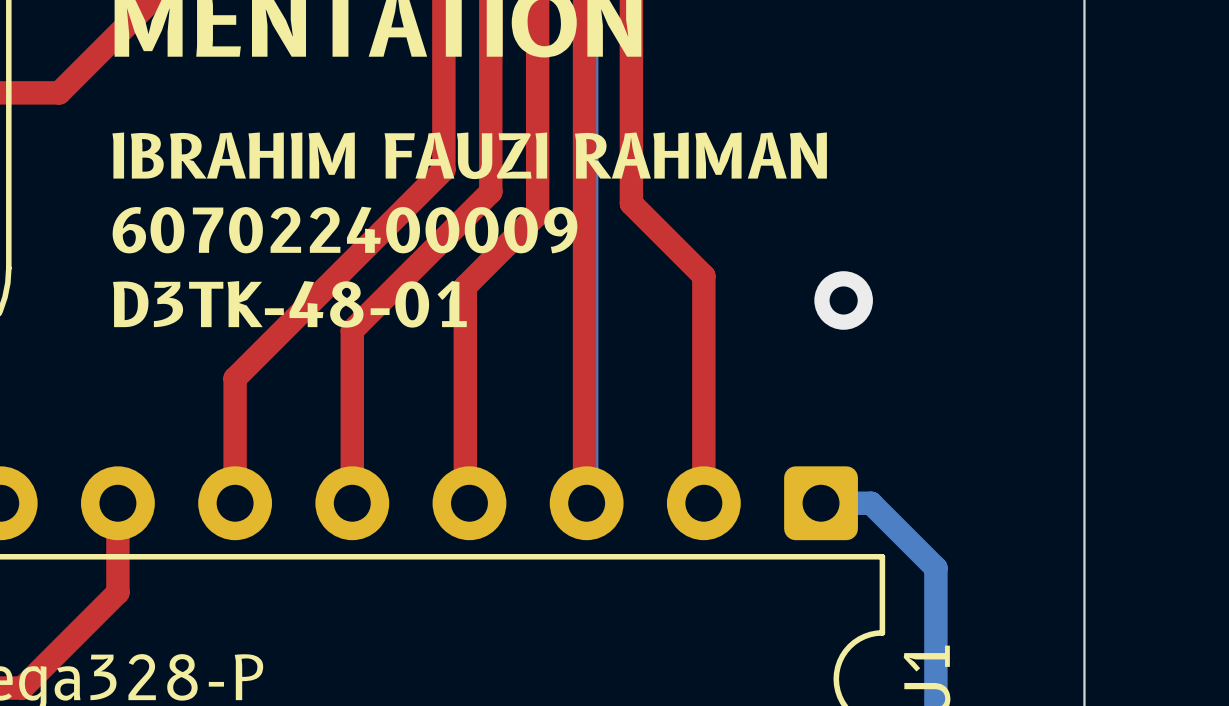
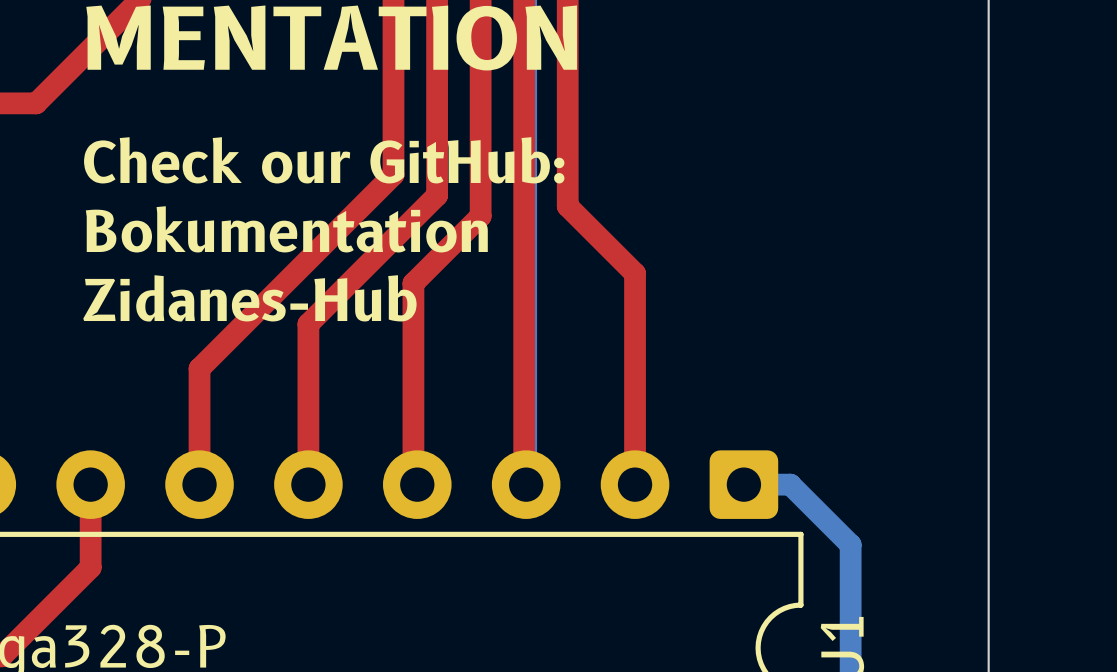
text: IBRAHIM FAUZI RAHMAN (469, 155) -> Check our GitHub: (324, 160)
text: 607022400009 (344, 230) -> Bokumentation (286, 229)
via: (843, 300) -> none
text: D3TK-48-01 (289, 304) -> Zidanes-Hub (249, 298)

